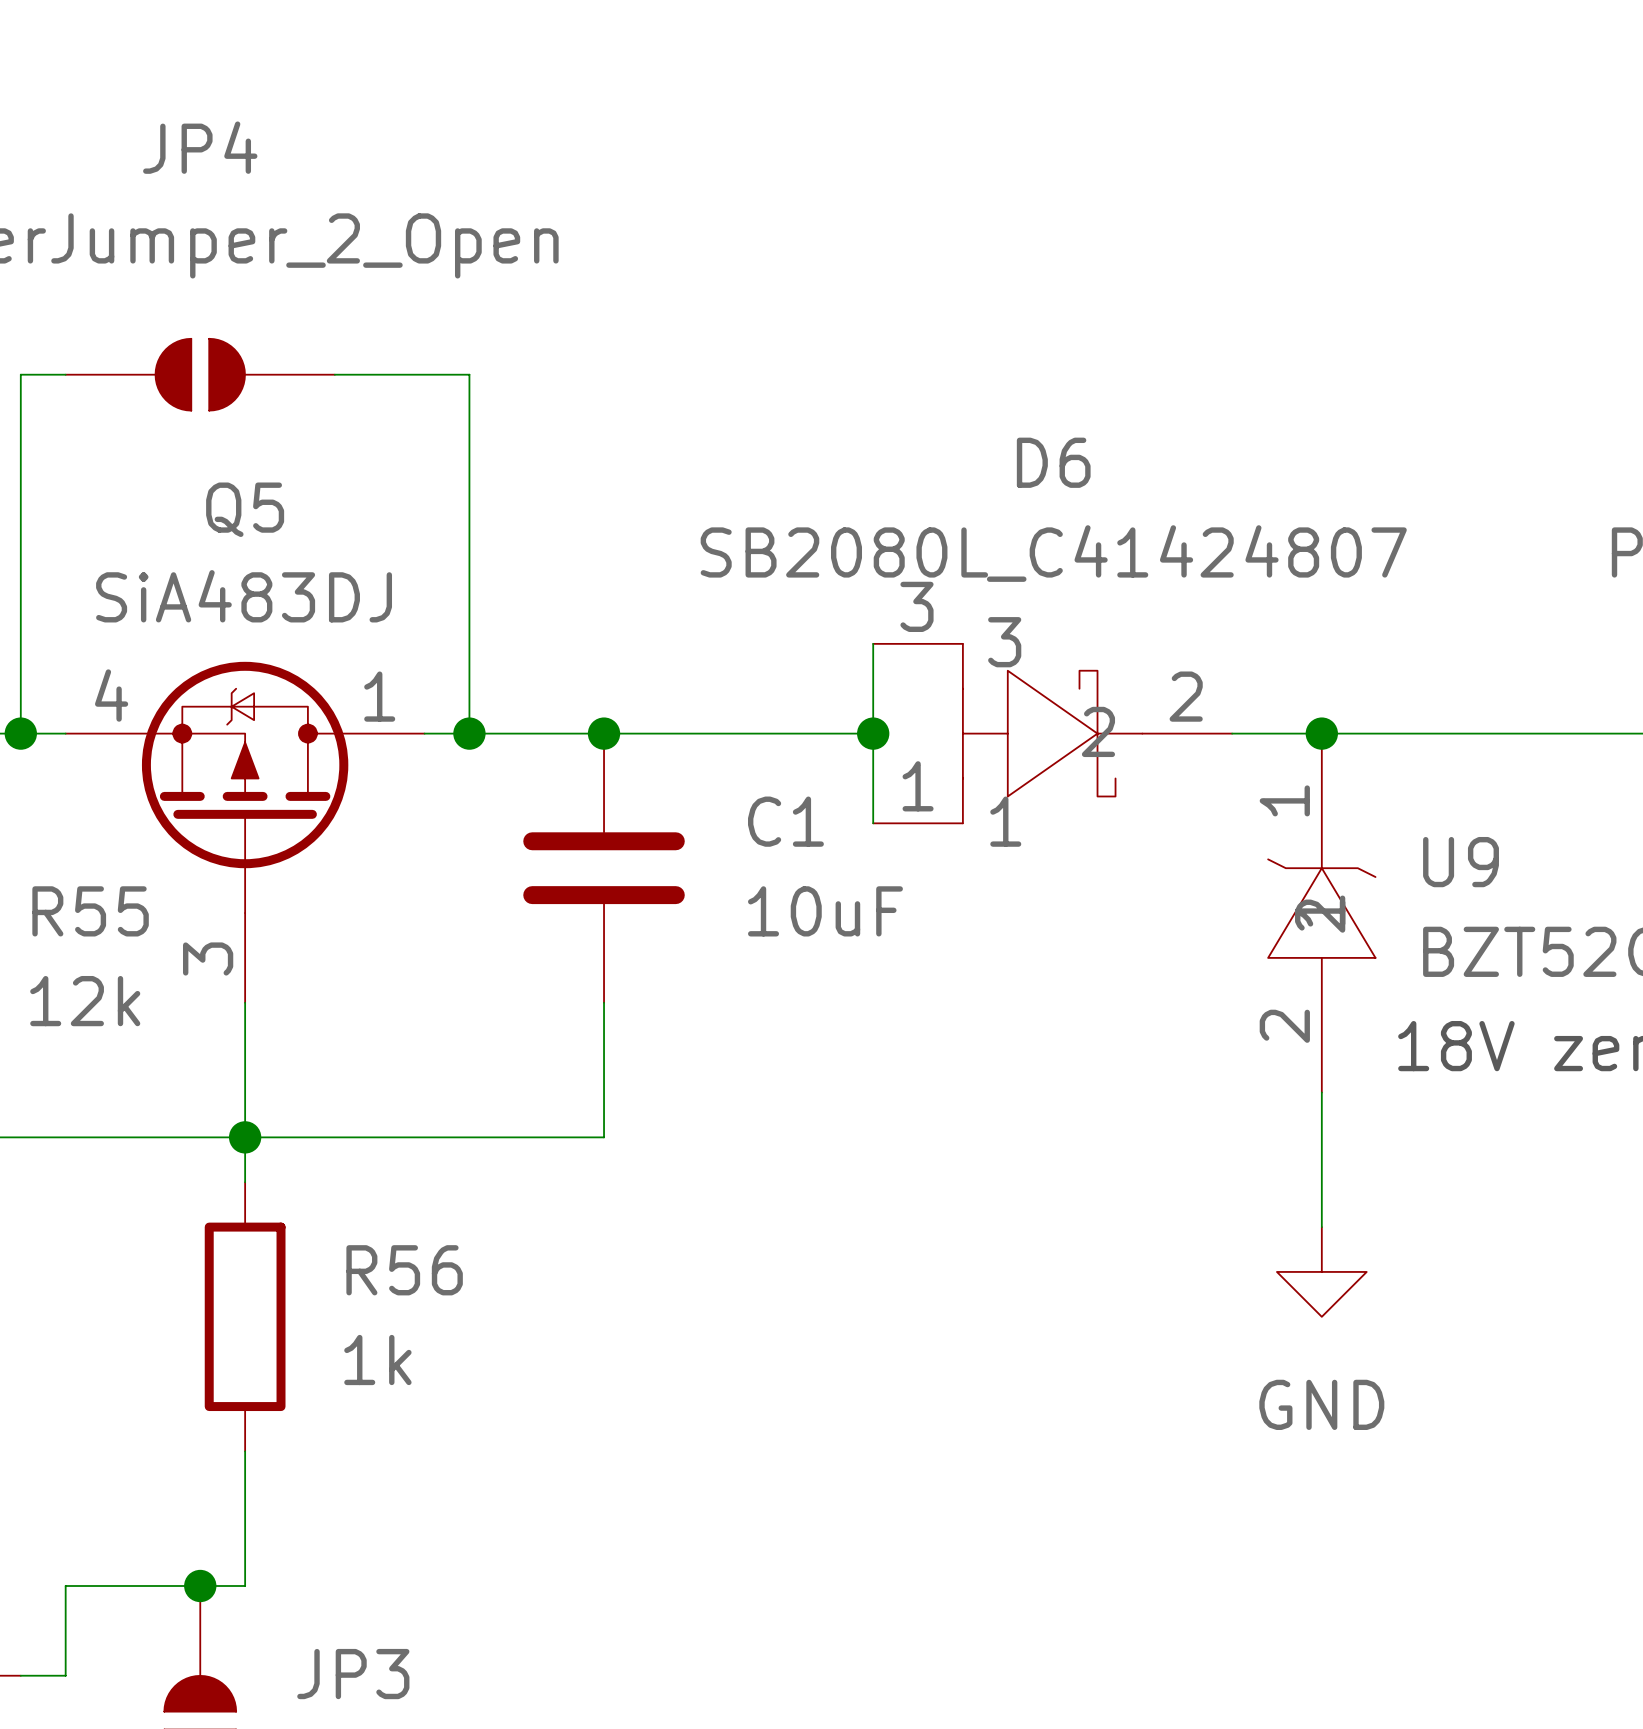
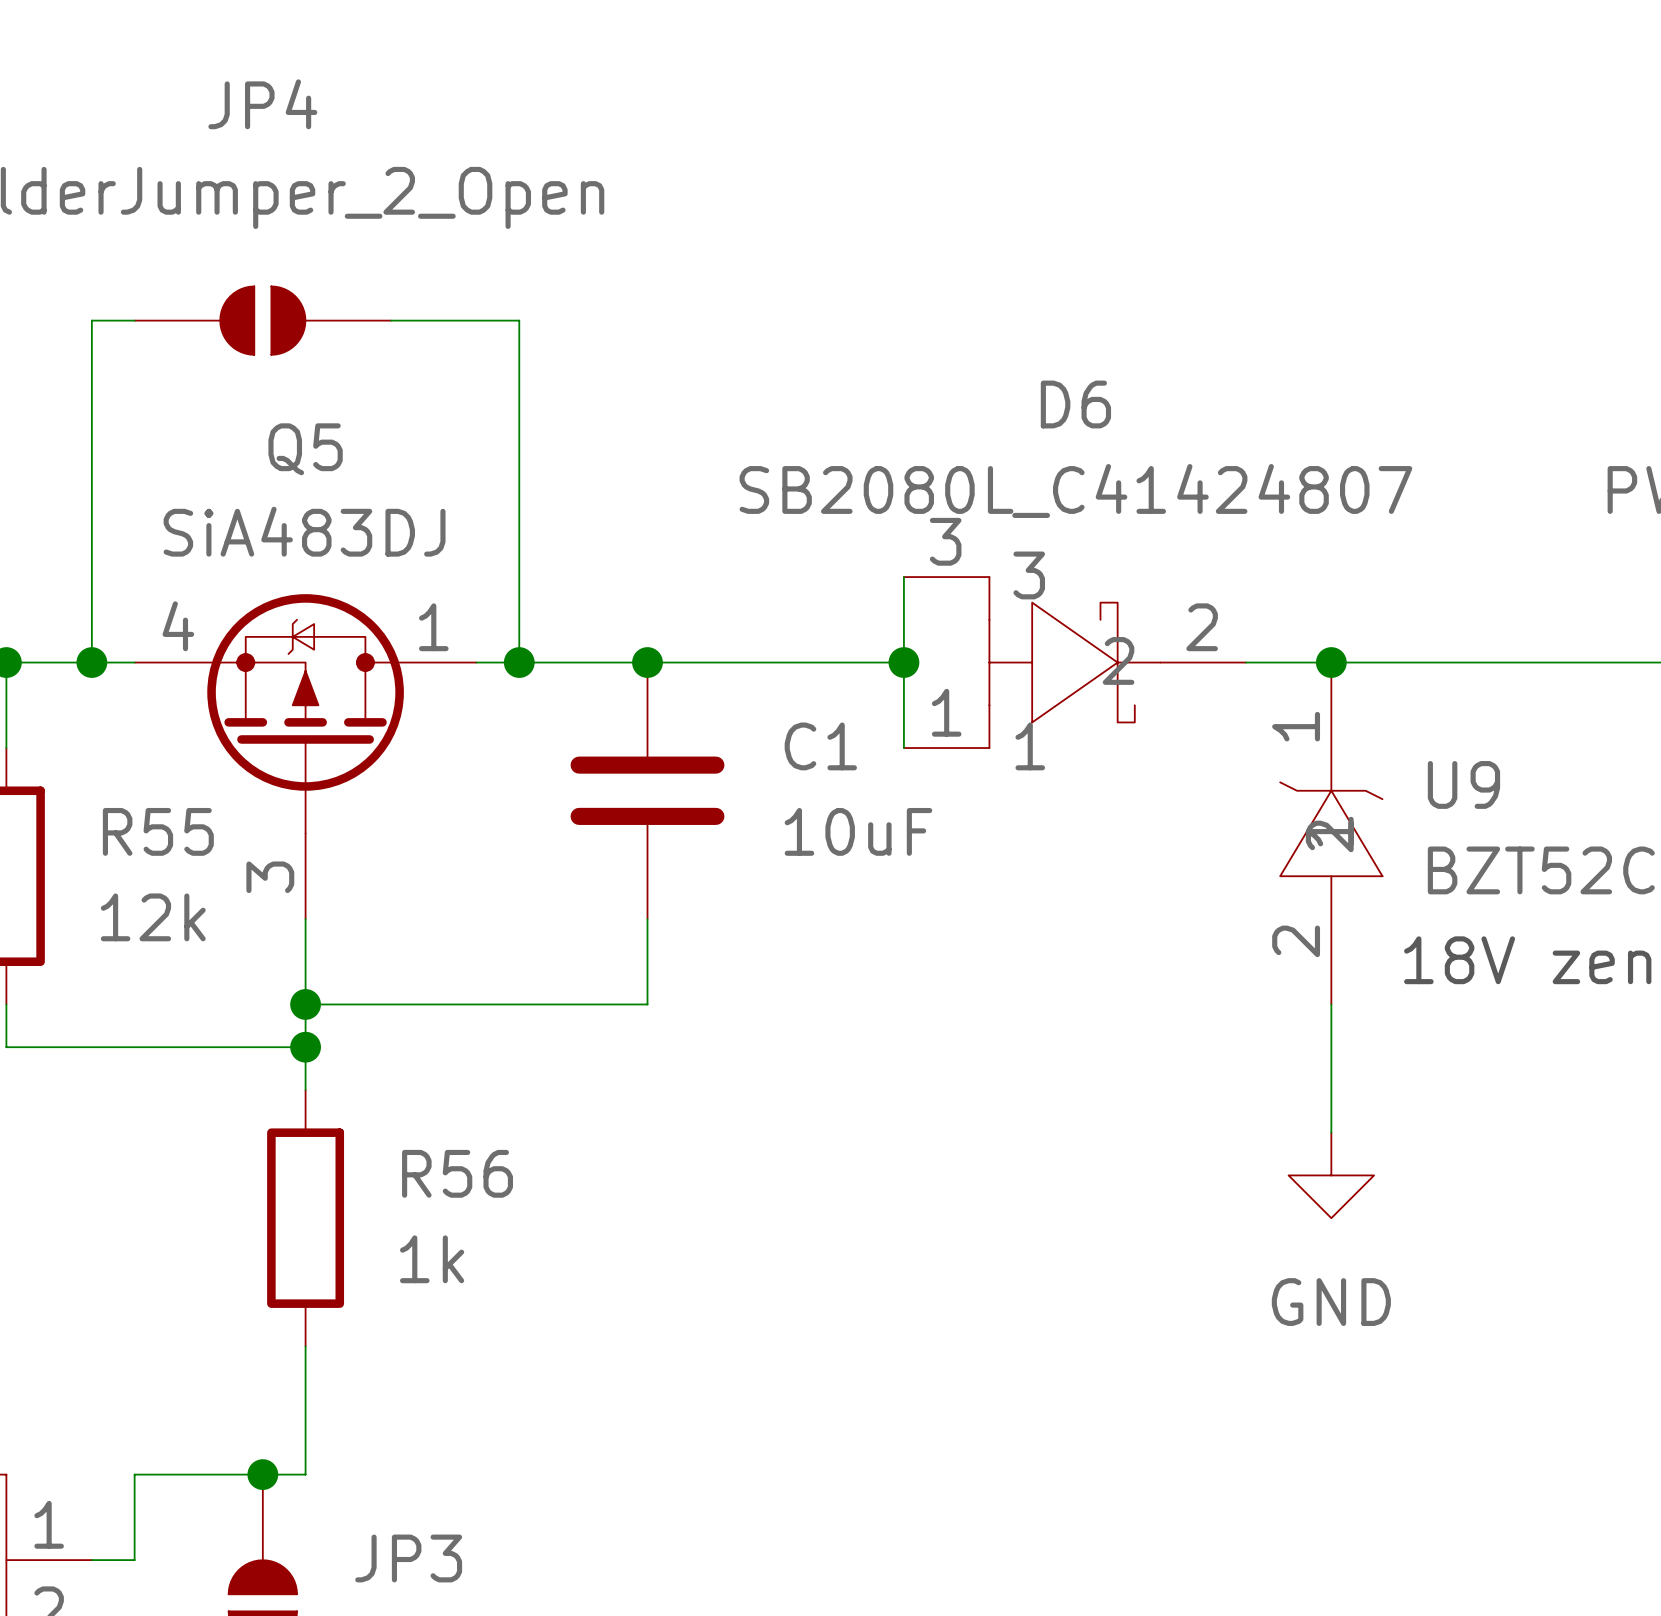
junction: none -> (305, 1004)
wire: (604, 1092) (604, 1137) (245, 1137) -> (647, 1004) (305, 1004)

